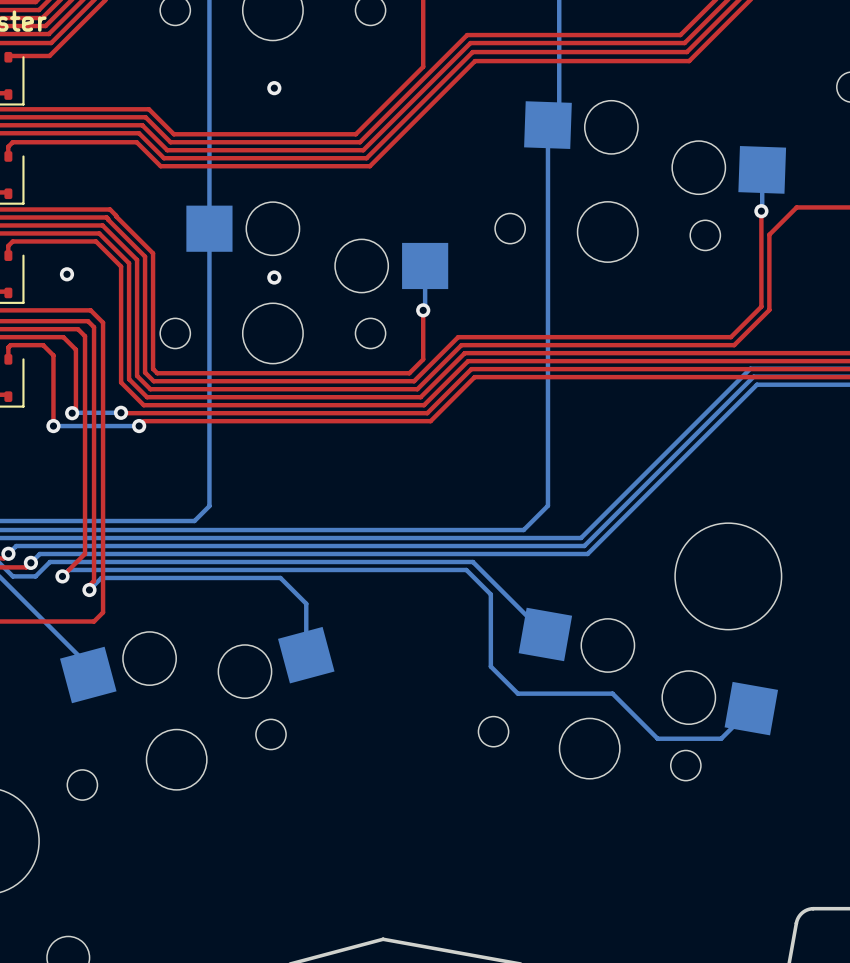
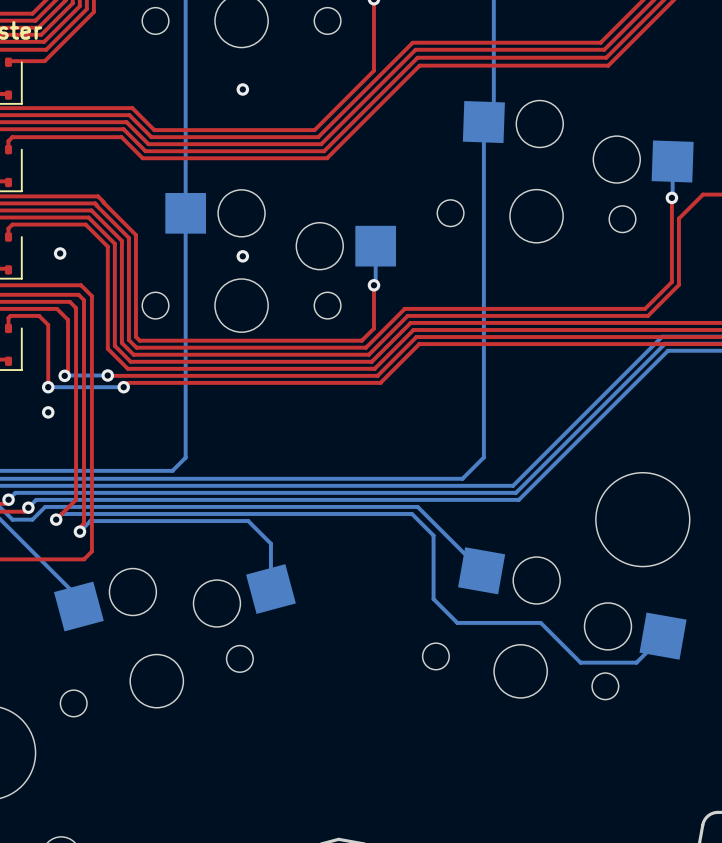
via: none -> (48, 412)

